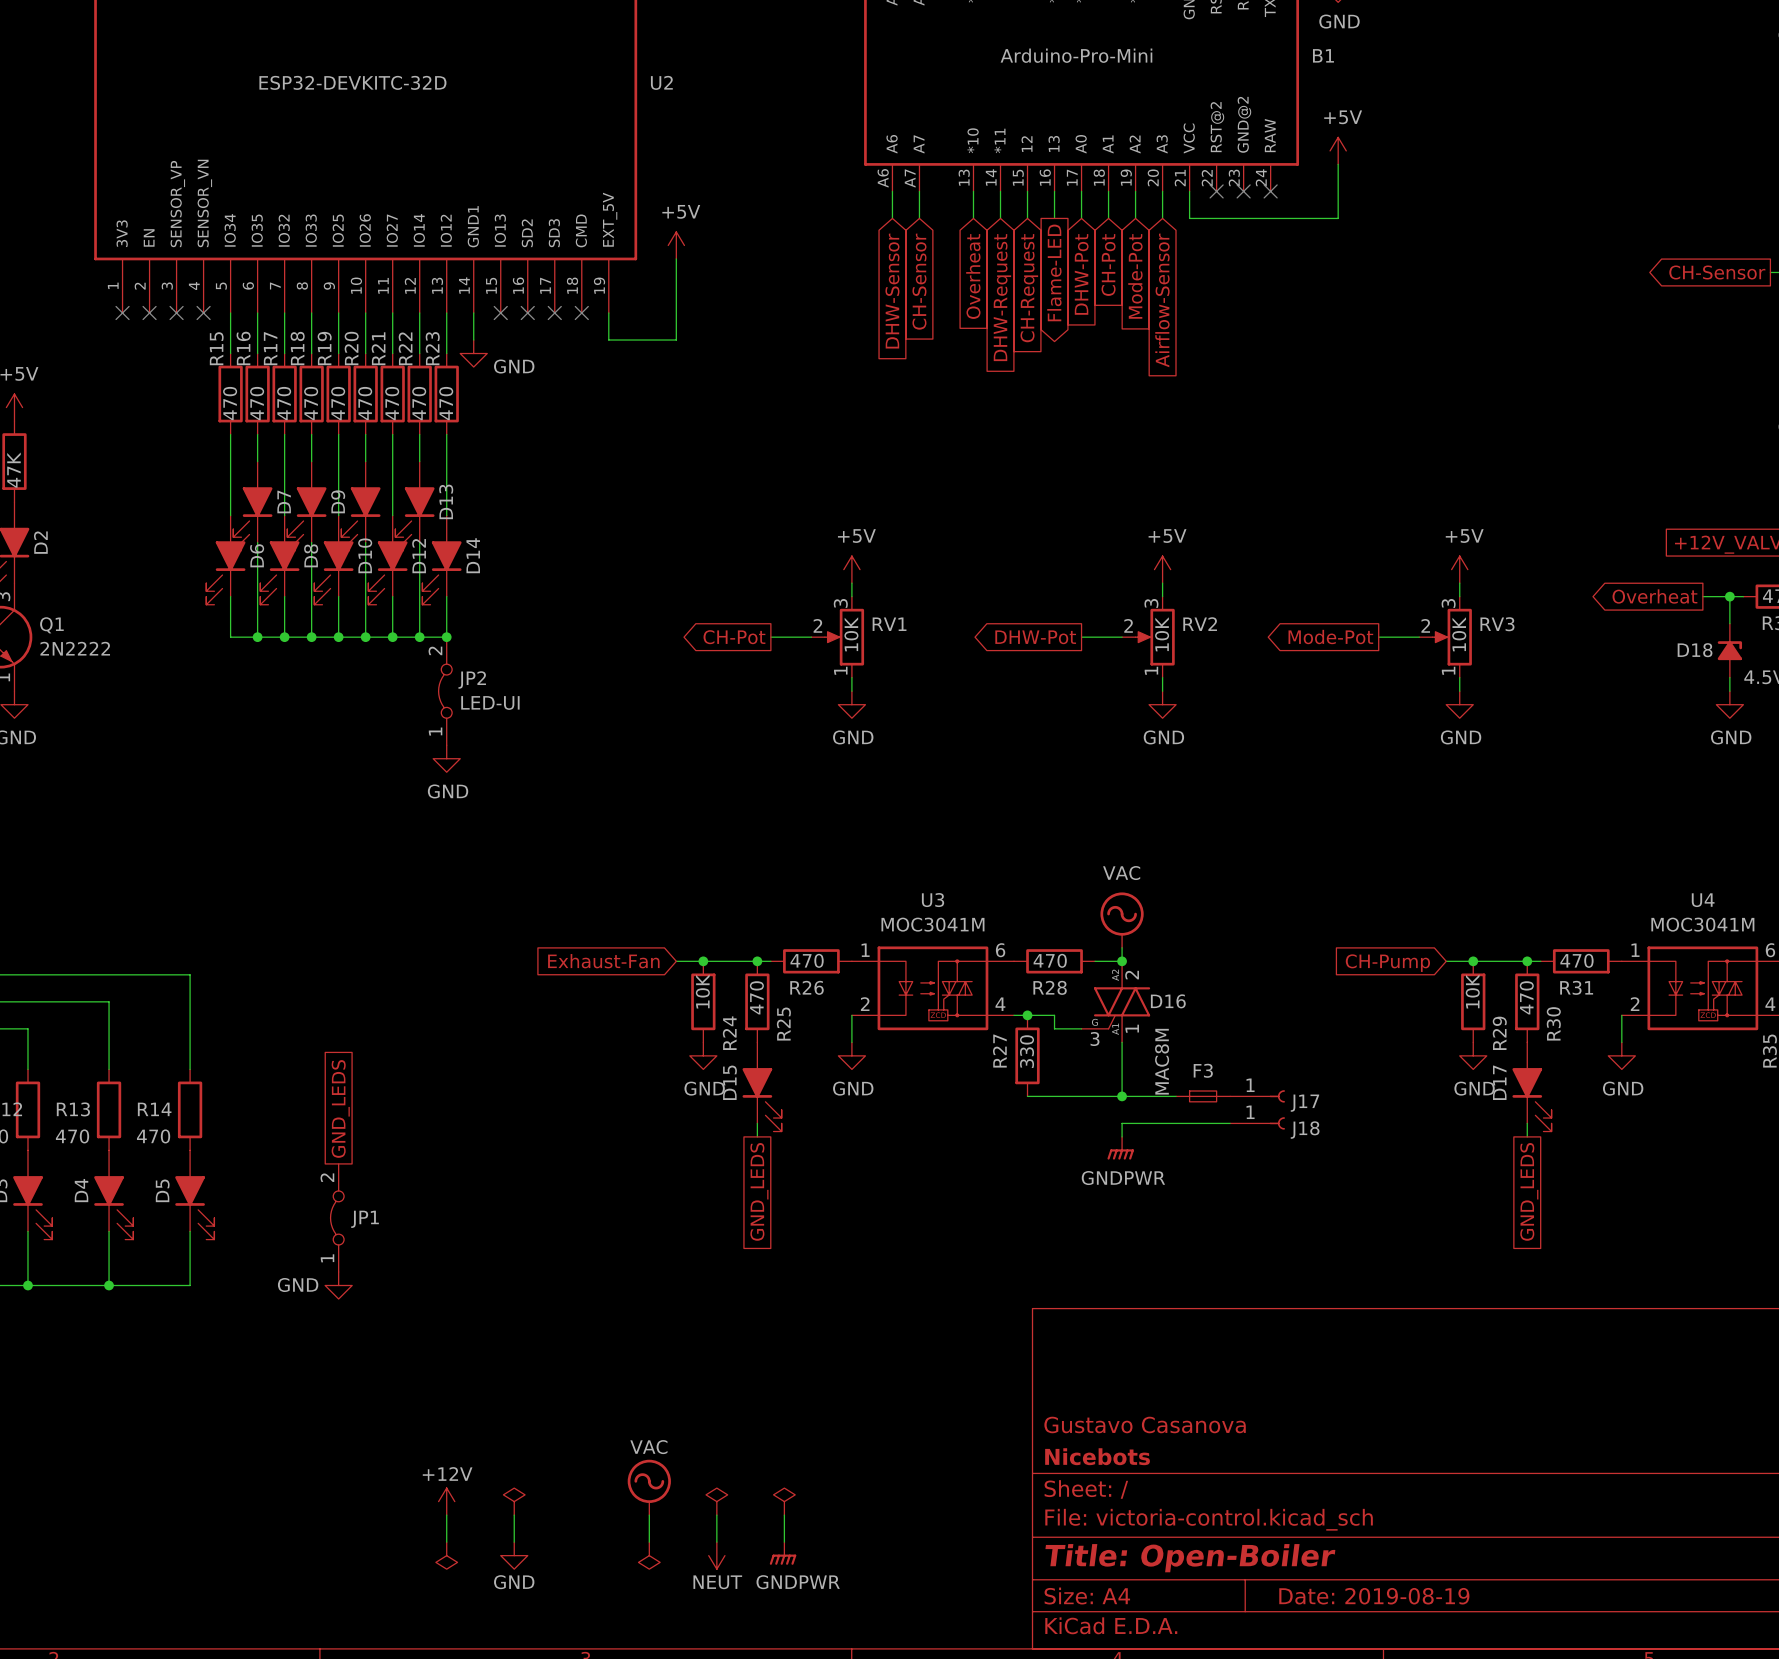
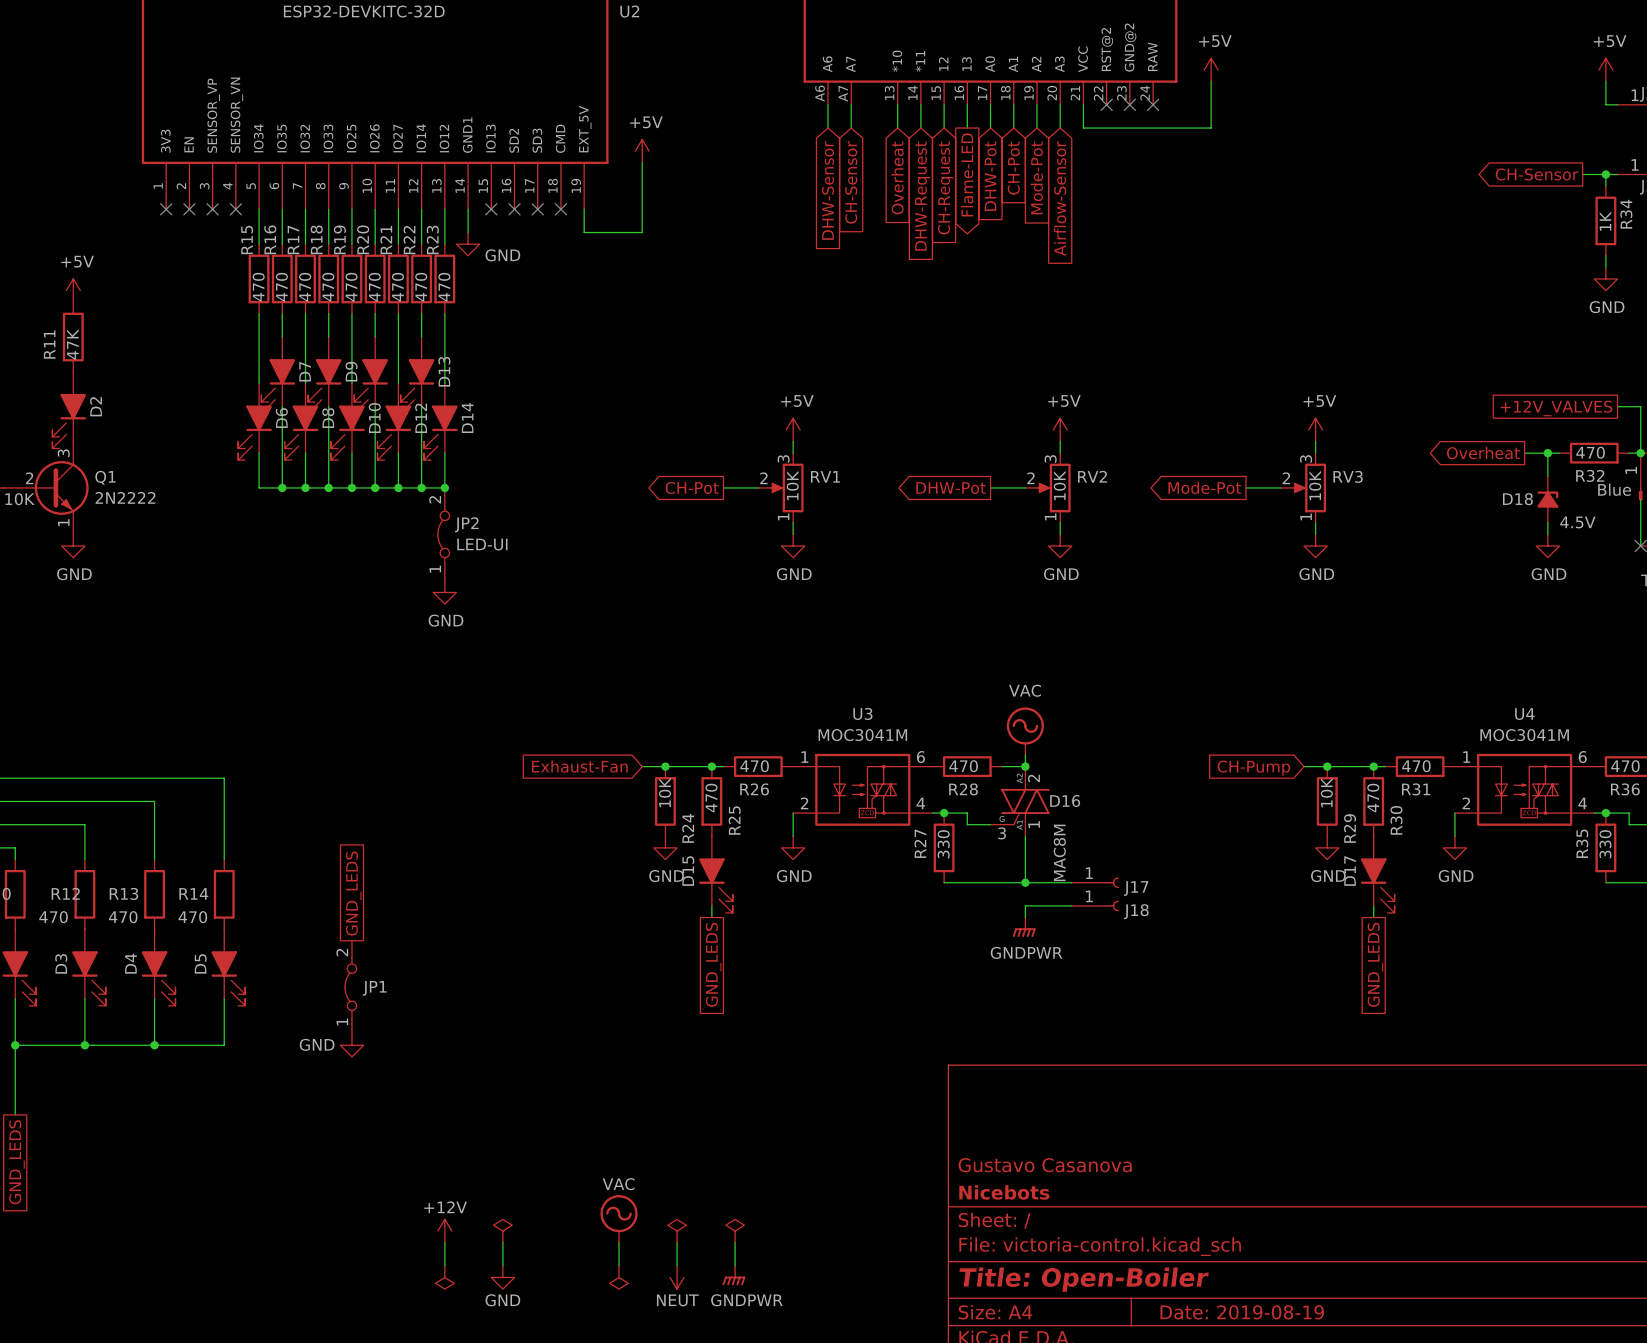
F3: (1203, 1096) -> none
J17 position: (1257, 1096) -> (1095, 882)
J18 position: (1257, 1123) -> (1095, 905)

